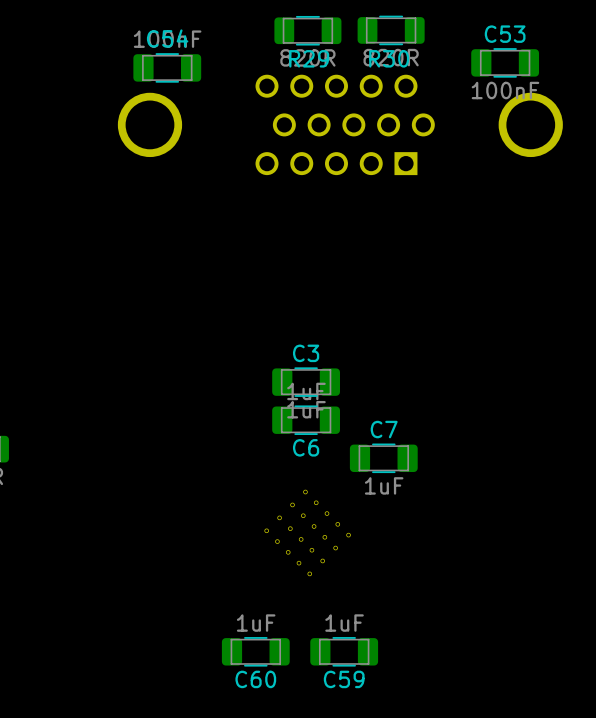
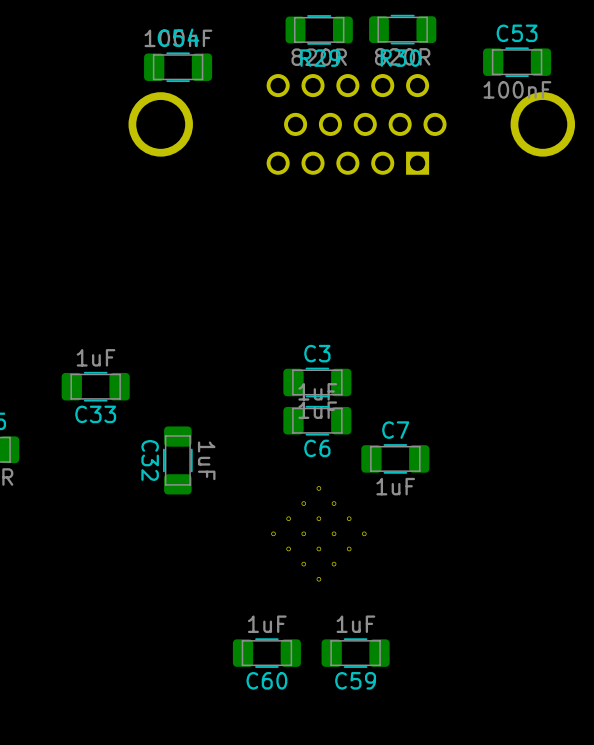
C33: none -> 1uF (95, 386)
C32: none -> 1uF (177, 460)
part footprint: [264, 489, 351, 577] -> [271, 486, 367, 582]

